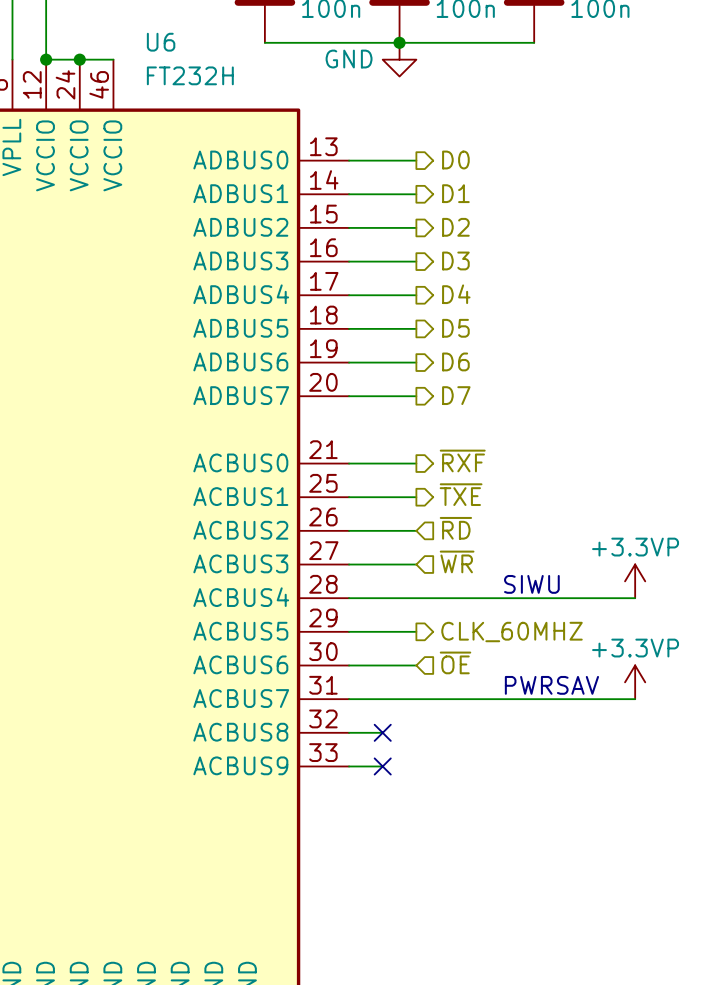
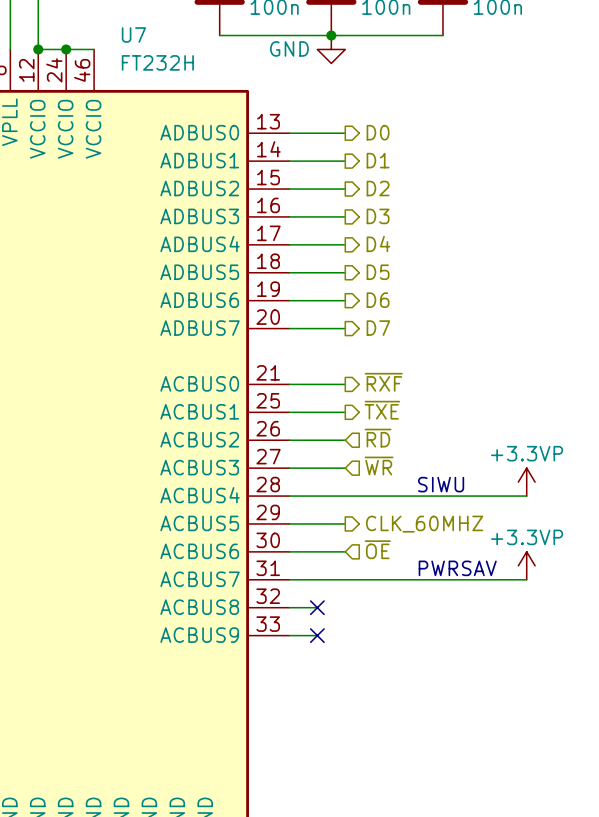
U6 name: U6 (161, 42) -> U7 (133, 34)

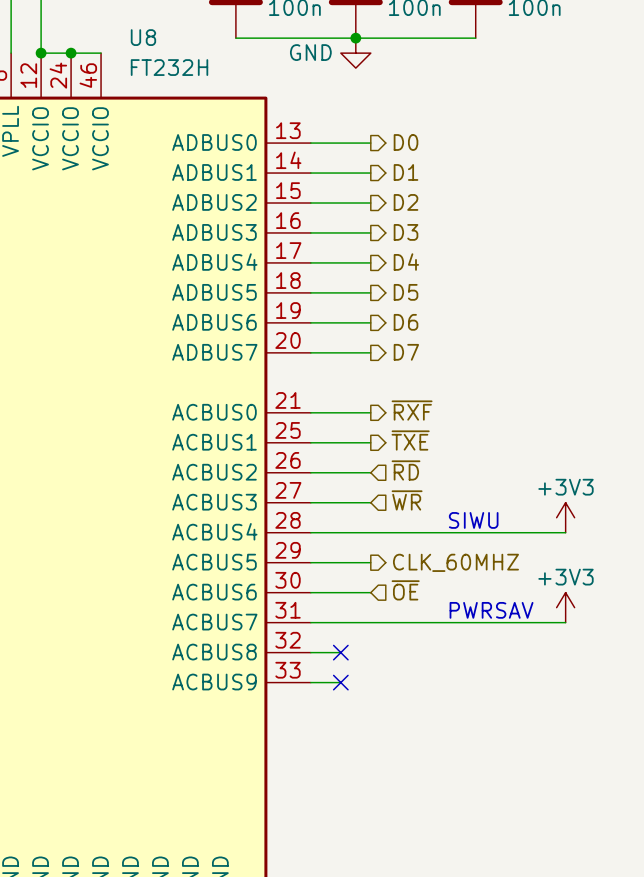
U7 name: U7 (133, 34) -> U8 (143, 37)
power symbol: +3.3VP (526, 482) -> +3V3 (565, 517)
power symbol: +3.3VP (526, 565) -> +3V3 (565, 607)

